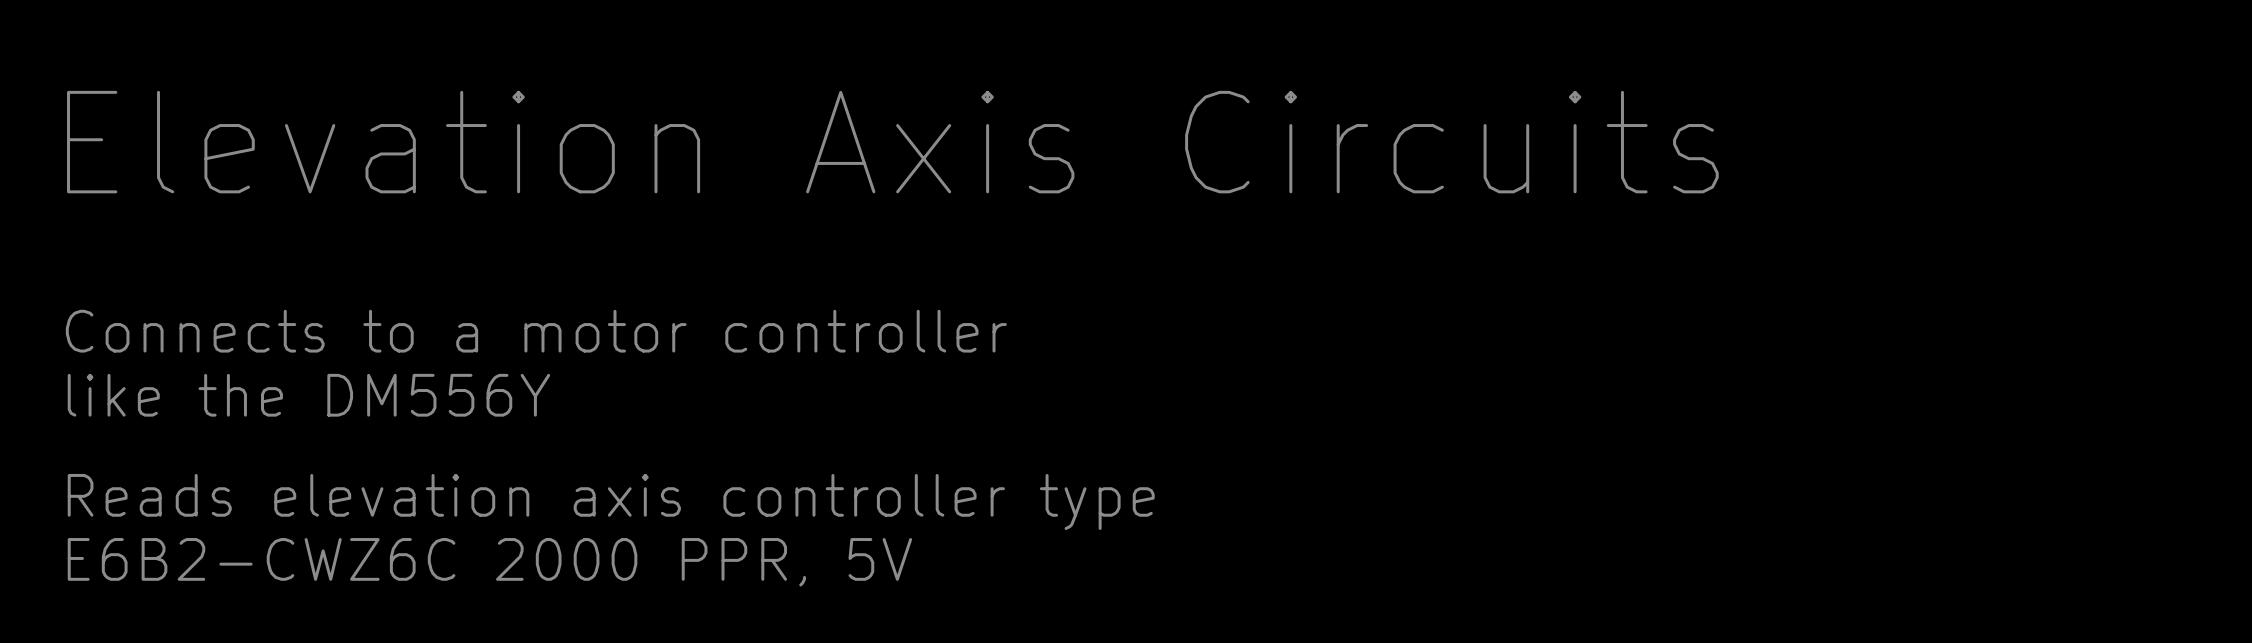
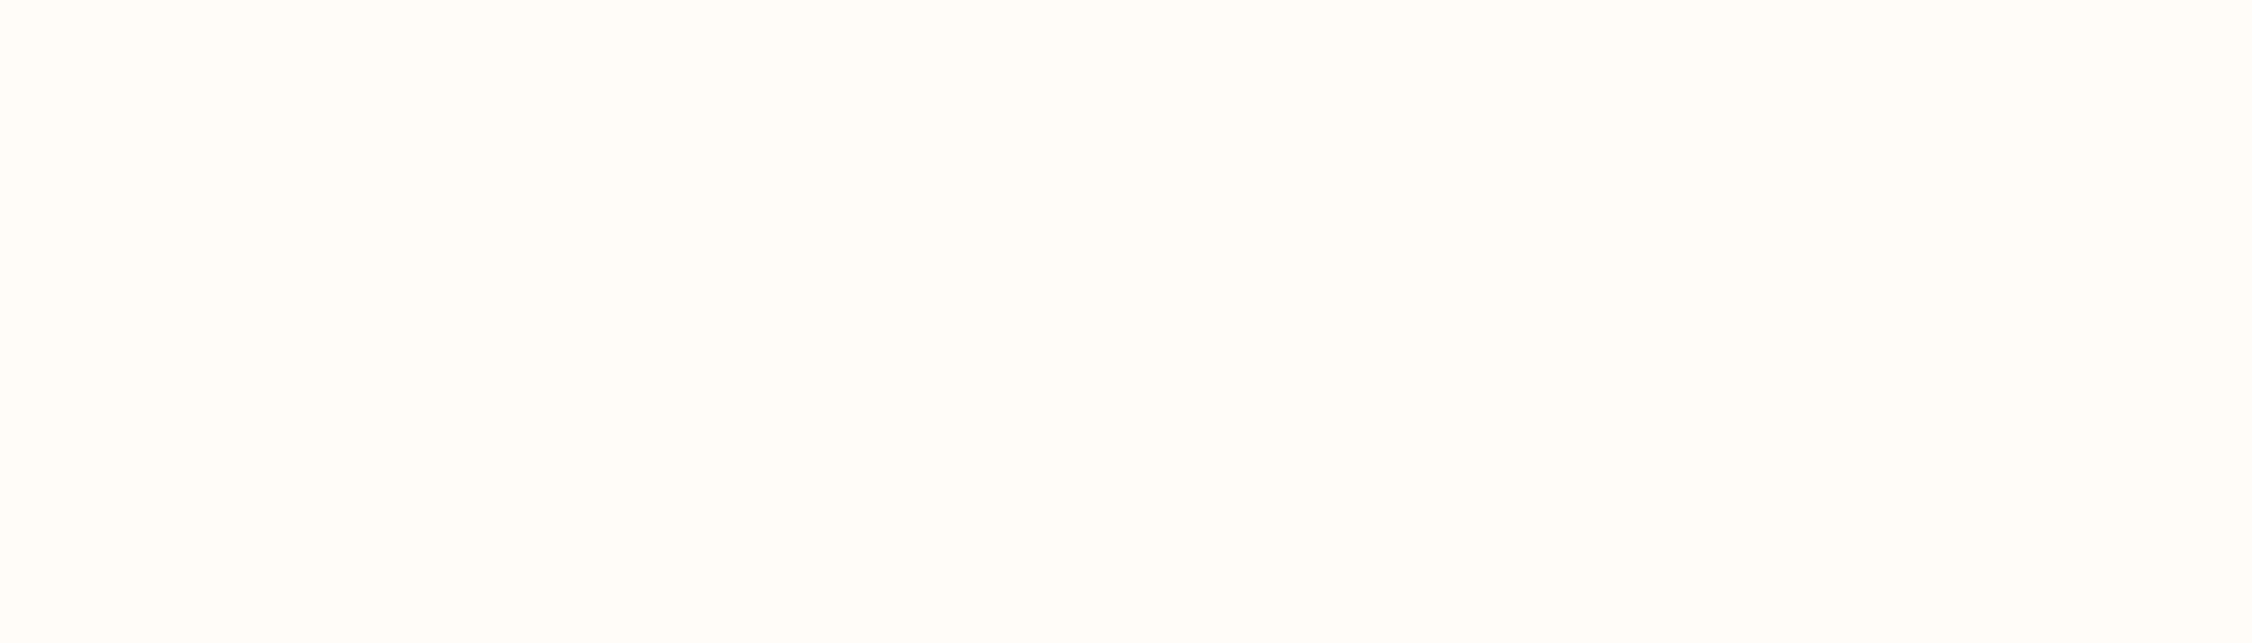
text: Elevation Axis Circuits (892, 142) -> none
text: Connects to a motor controller (536, 331) -> none
text: like the DM556Y (308, 395) -> none
text: Reads elevation axis controller type (611, 501) -> none
text: E6B2-CWZ6C 2000 PPR, 5V (489, 562) -> none

